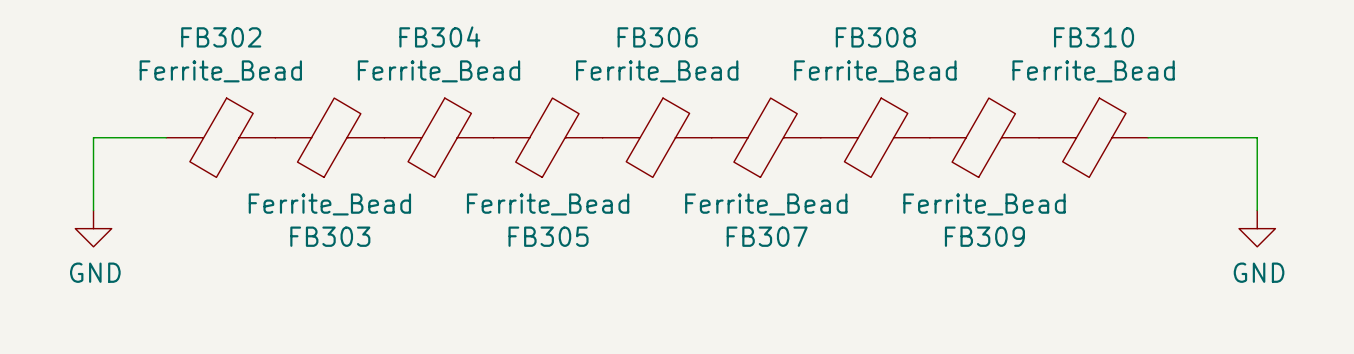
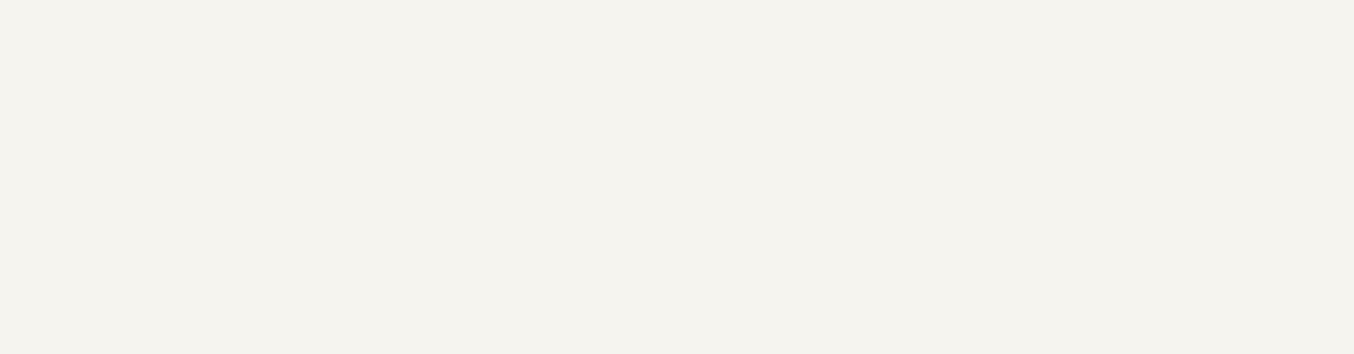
wire: (166, 137) (93, 137) (93, 210) -> none
FB302: Ferrite_Bead (220, 137) -> none
FB303: Ferrite_Bead (329, 137) -> none
FB304: Ferrite_Bead (438, 137) -> none
FB305: Ferrite_Bead (548, 137) -> none
FB306: Ferrite_Bead (657, 137) -> none
FB307: Ferrite_Bead (766, 137) -> none
FB308: Ferrite_Bead (875, 137) -> none
FB309: Ferrite_Bead (984, 137) -> none
FB310: Ferrite_Bead (1093, 137) -> none
wire: (1148, 137) (1257, 137) (1257, 210) -> none
power symbol: GND (93, 228) -> none
power symbol: GND (1257, 228) -> none

